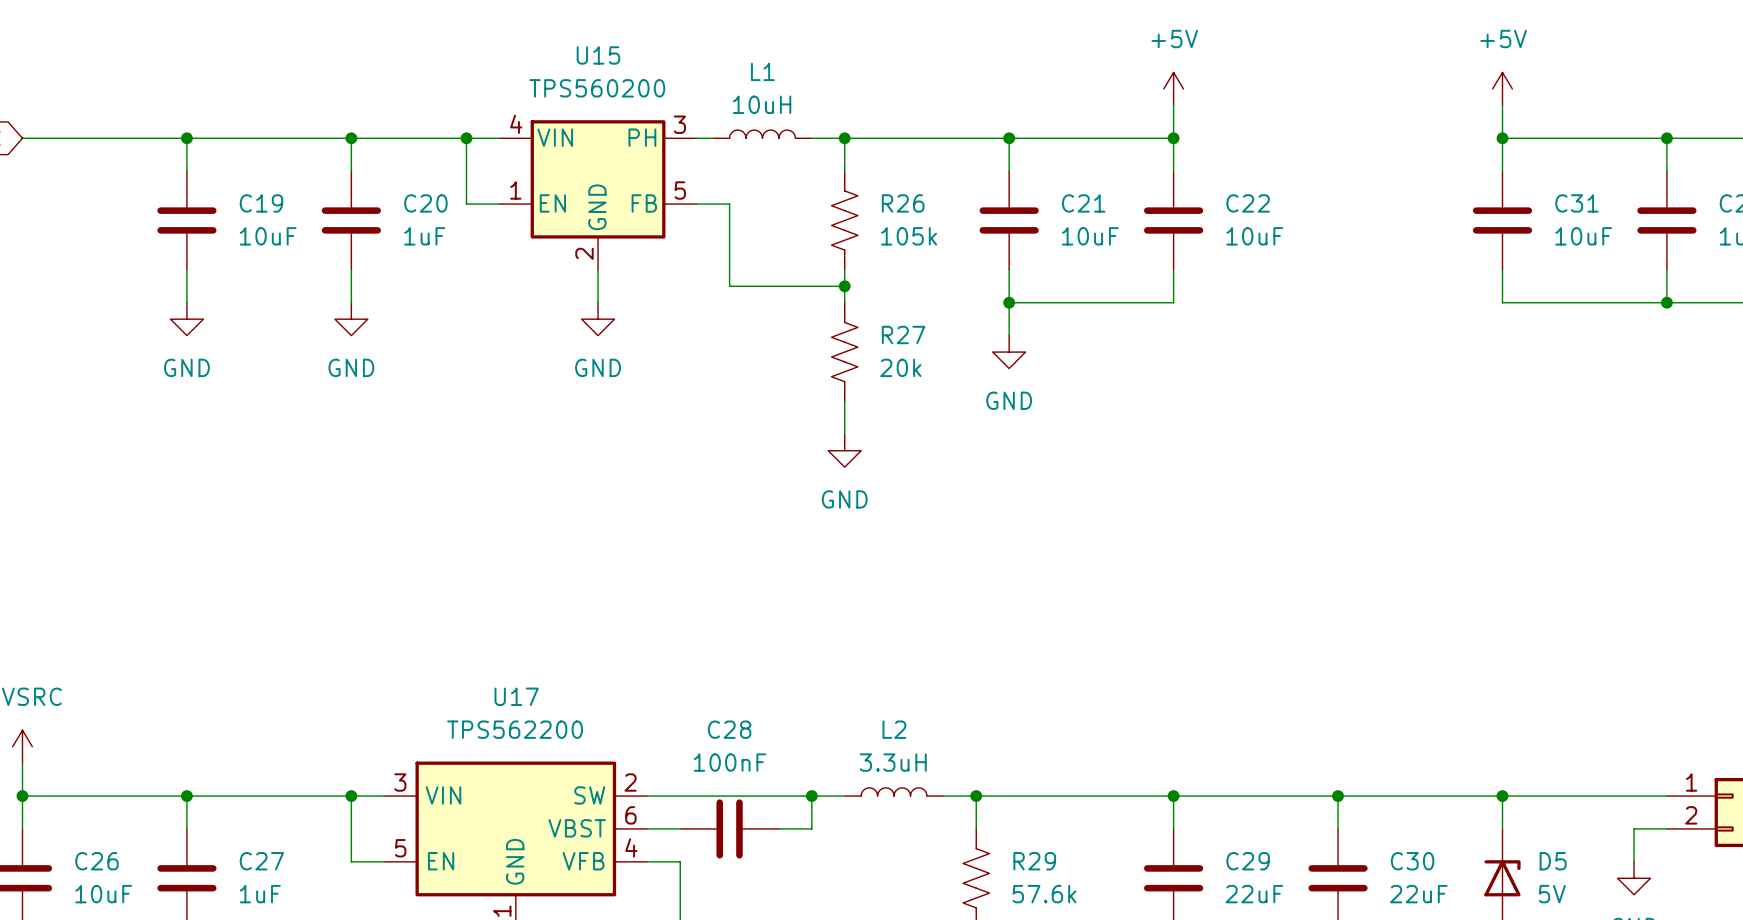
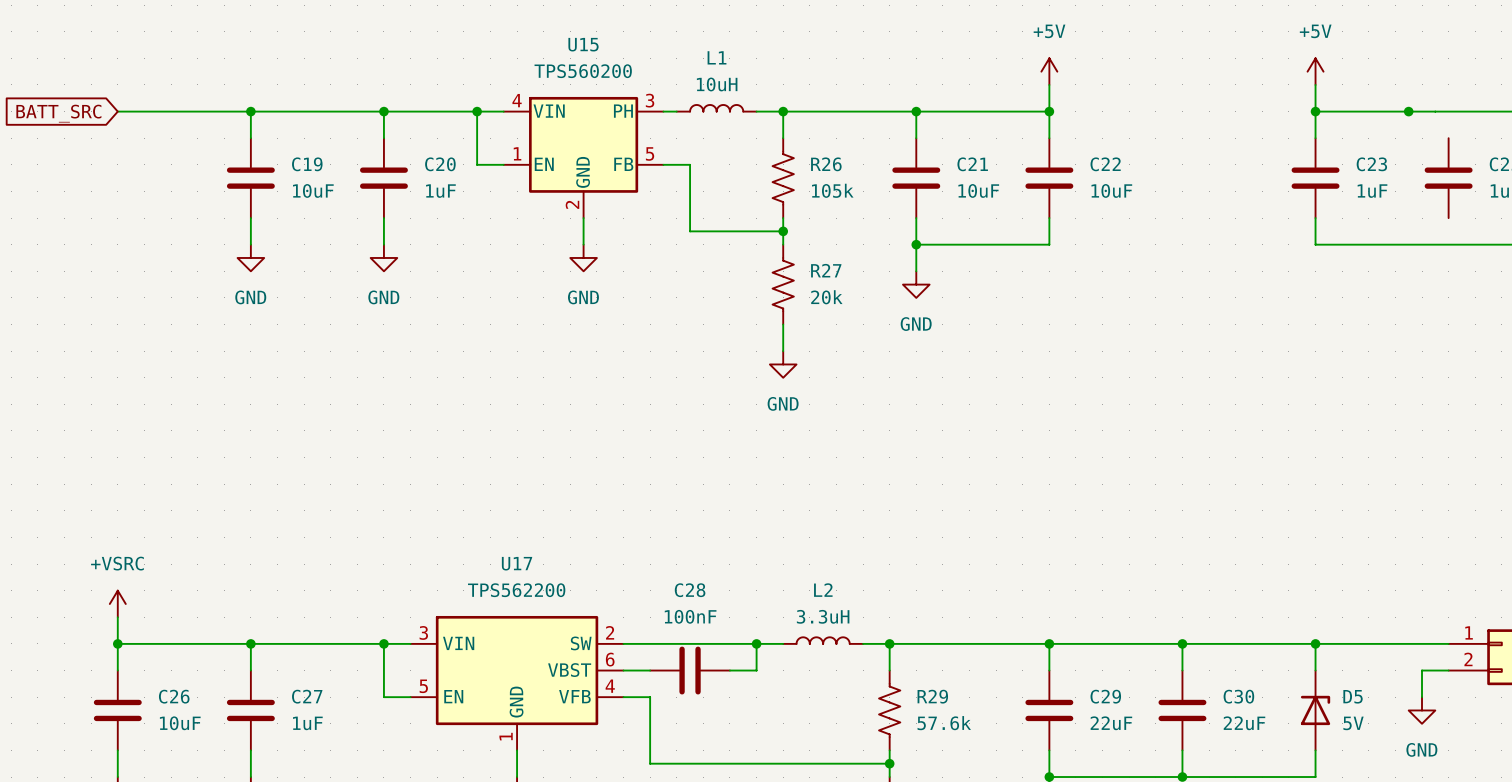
wire: (1666, 138) (1666, 171) -> none
junction position: (1666, 138) -> (1408, 111)
C31 name: C31 (1577, 203) -> C23 (1371, 164)
C31 value: 10uF (1583, 236) -> 1uF (1372, 191)
wire: (1666, 269) (1666, 302) -> none
junction: (1666, 302) -> none

